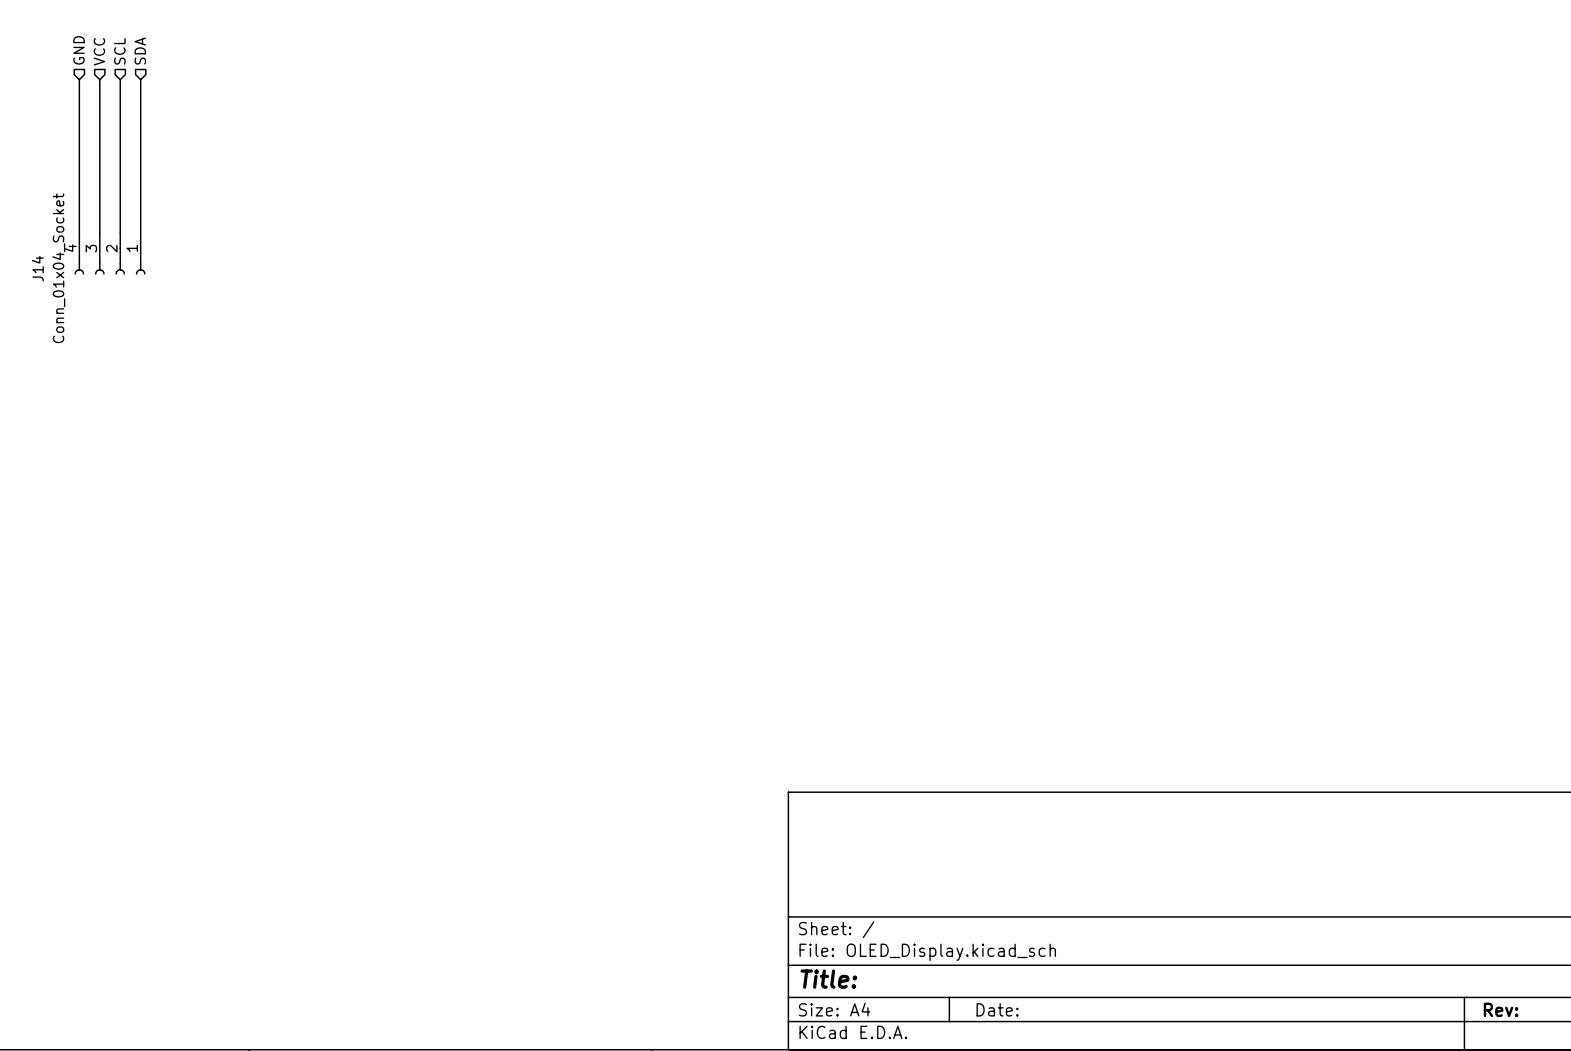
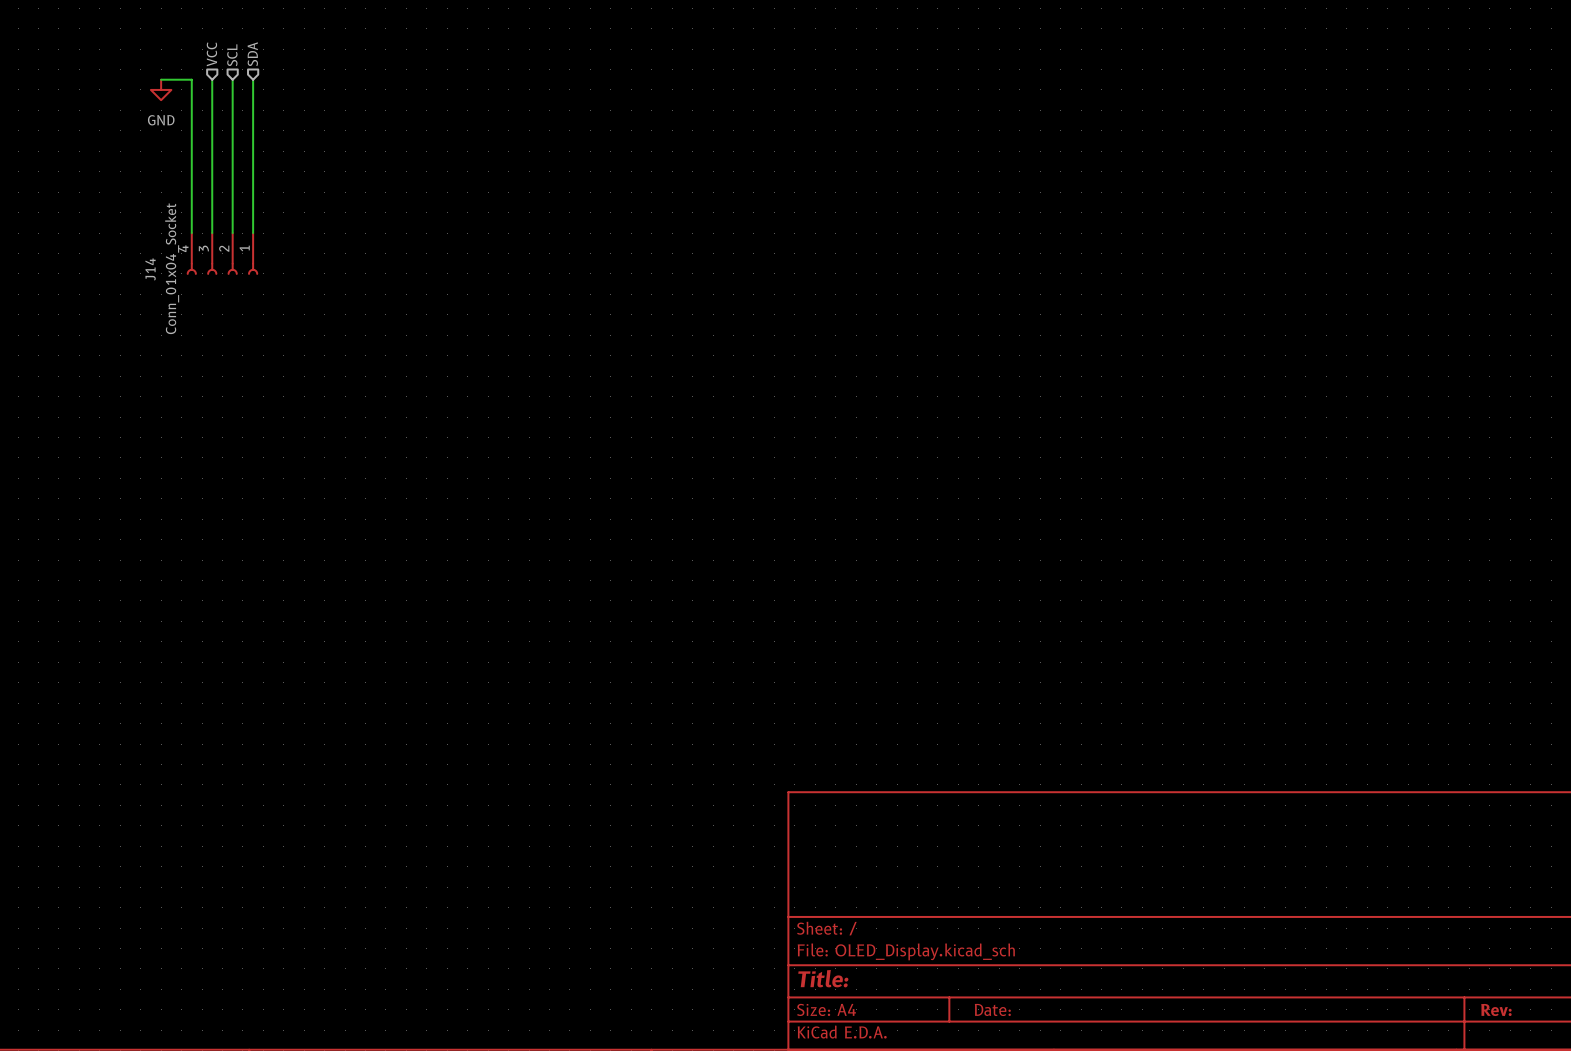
hierarchical label: GND (78, 50) -> none
hierarchical label position: VCC (99, 51) -> VCC (211, 54)
hierarchical label position: SCL (119, 51) -> SCL (232, 55)
hierarchical label position: SDA (140, 51) -> SDA (252, 54)
wire: (79, 79) (79, 233) -> none
wire: (99, 79) (99, 233) -> (212, 79) (212, 233)
wire: (120, 79) (120, 233) -> (232, 79) (232, 233)
wire: (140, 79) (140, 233) -> (253, 79) (253, 233)
wire: none -> (161, 79) (191, 79) (191, 233)
power symbol: none -> GND (161, 89)
J14 position: (110, 253) -> (222, 253)

